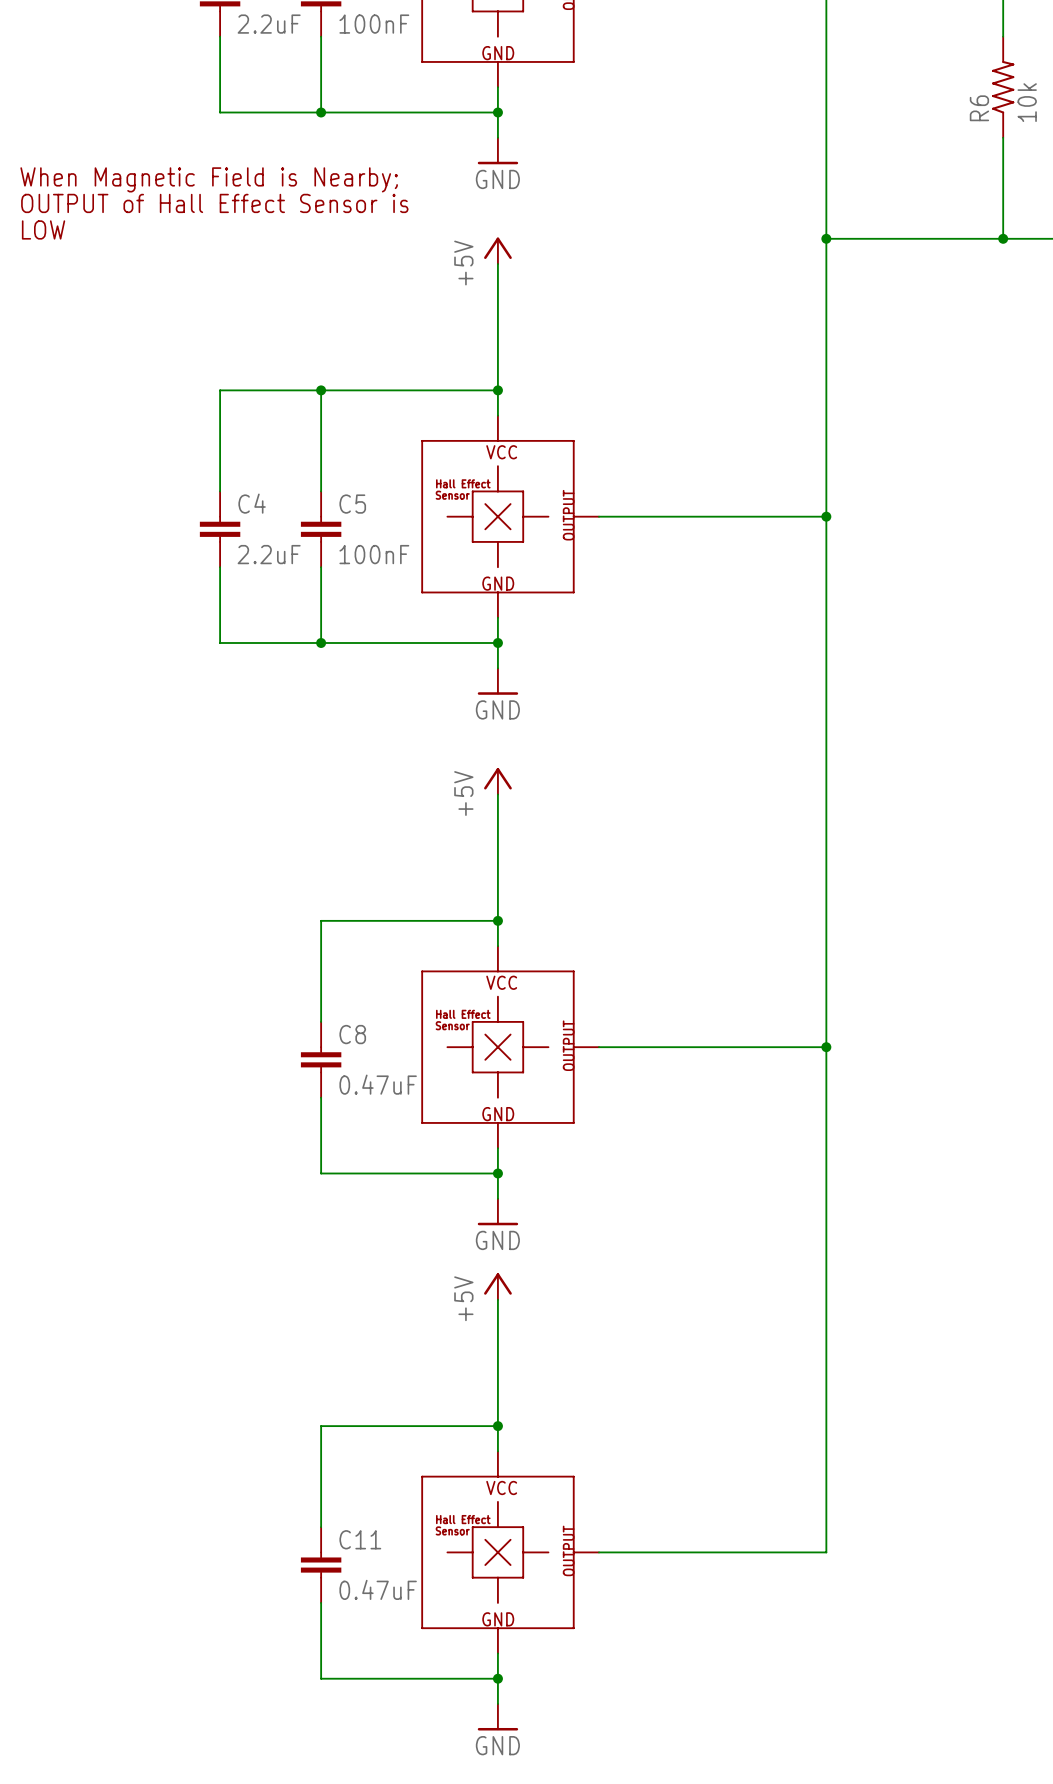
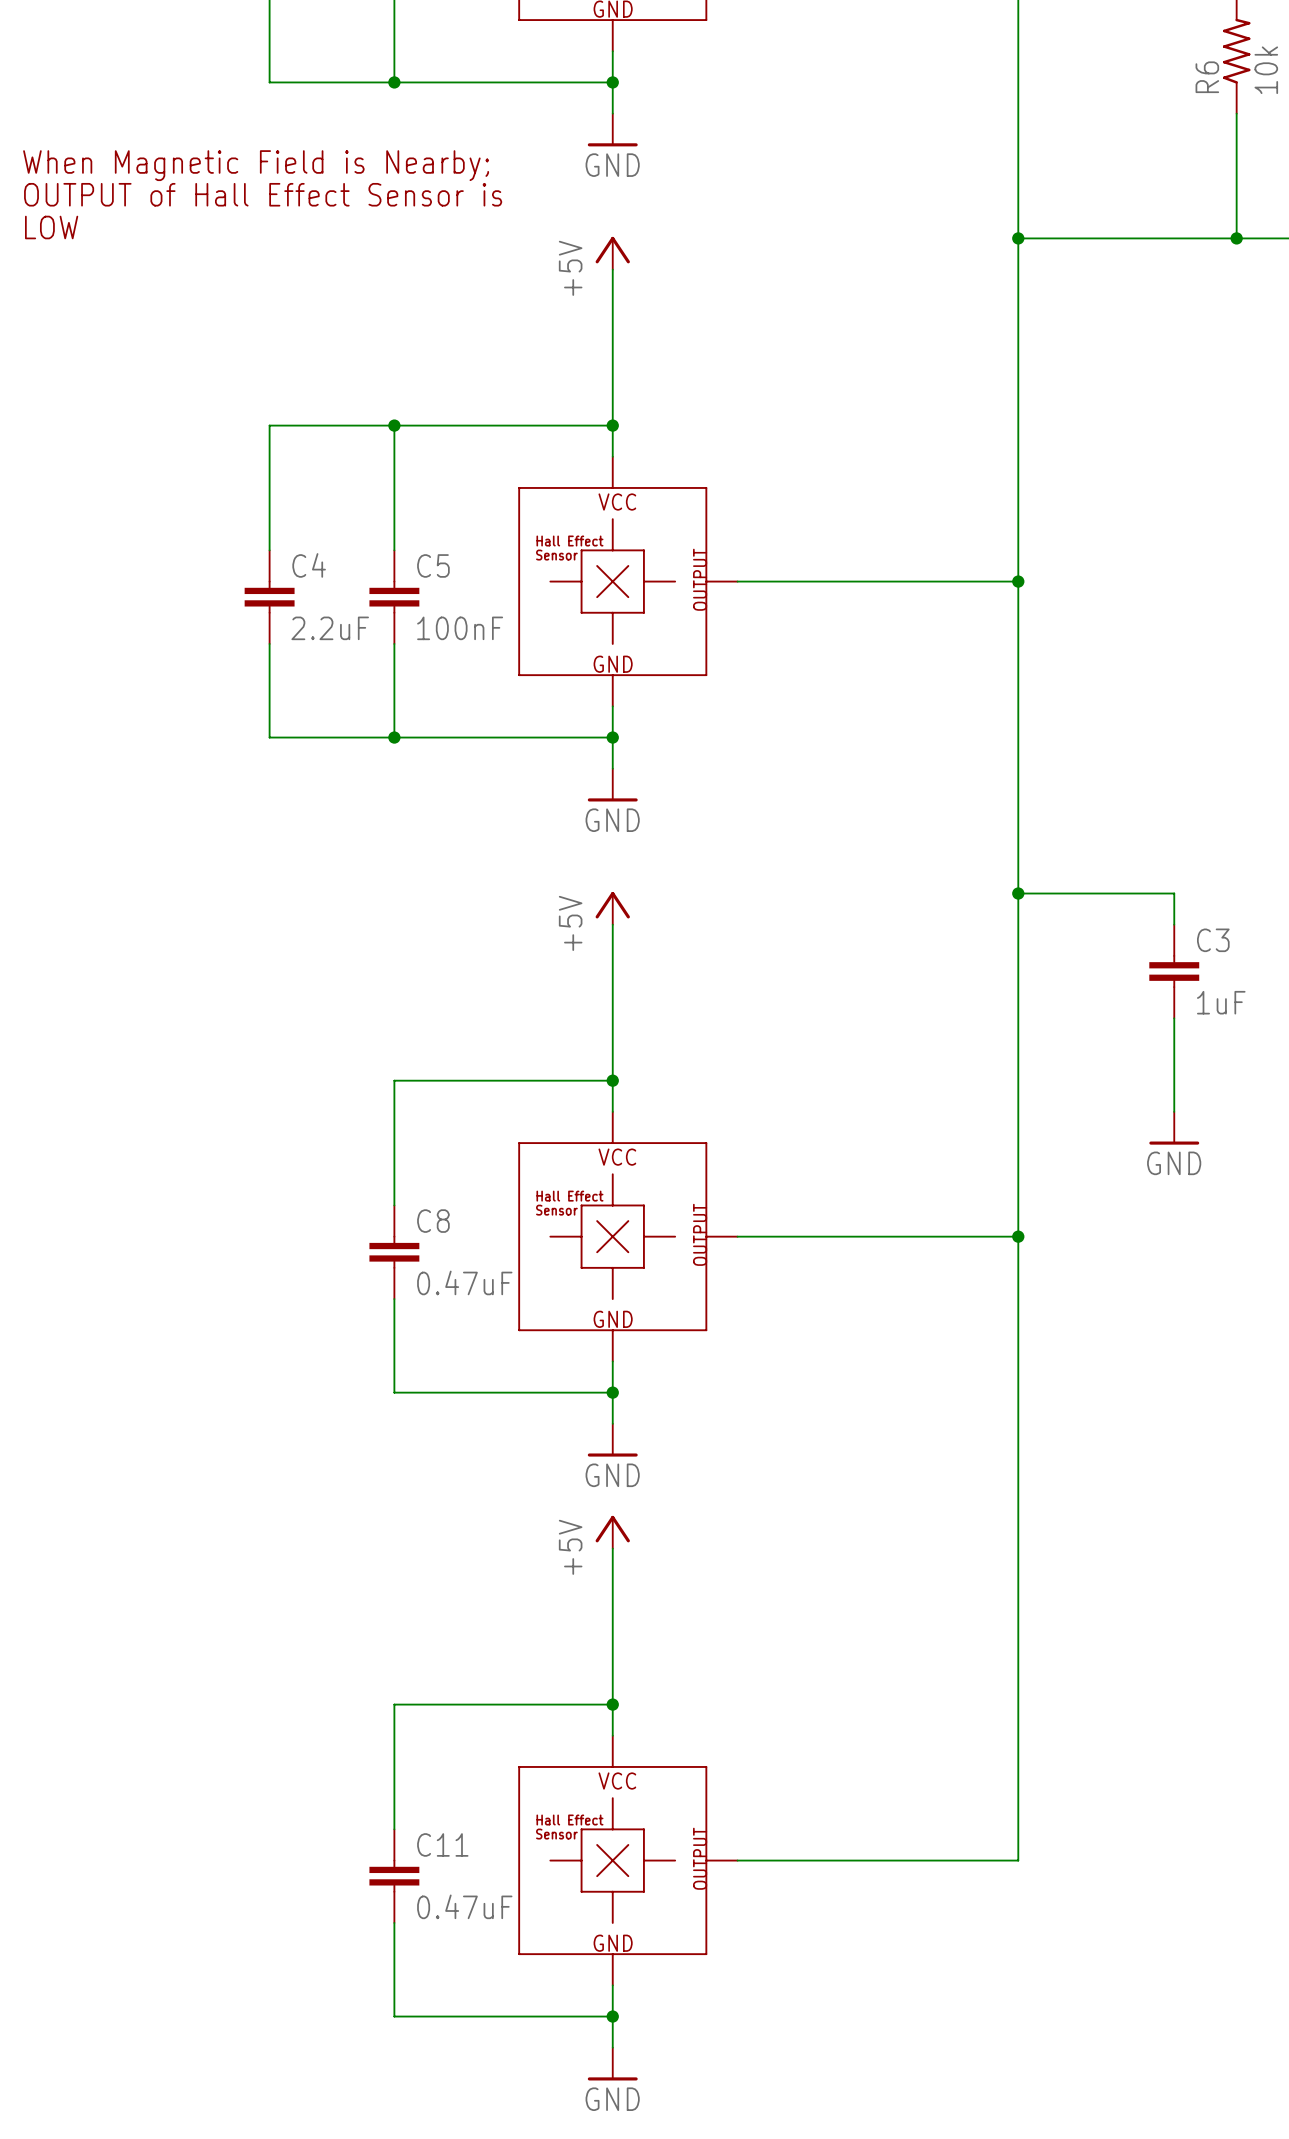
wire: none -> (1018, 893) (1174, 893) (1174, 924)
junction: none -> (1018, 893)
C3: none -> 1uF (1174, 971)
wire: none -> (1174, 1018) (1174, 1111)
power symbol: none -> GND (1174, 1128)

